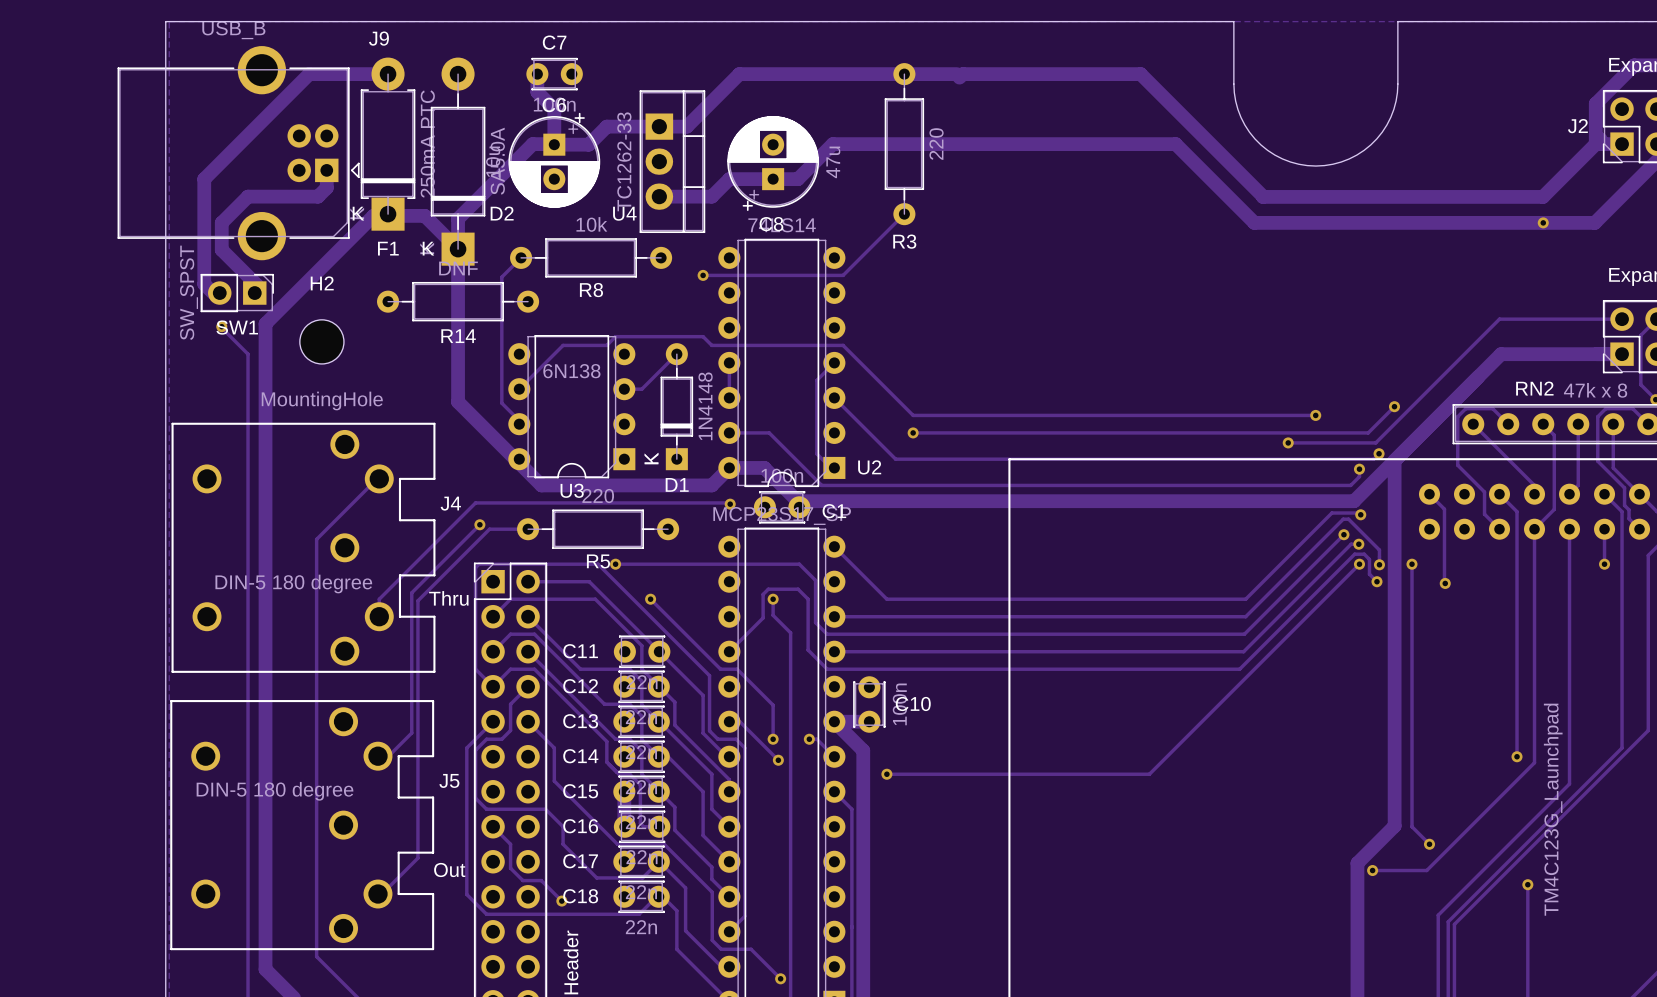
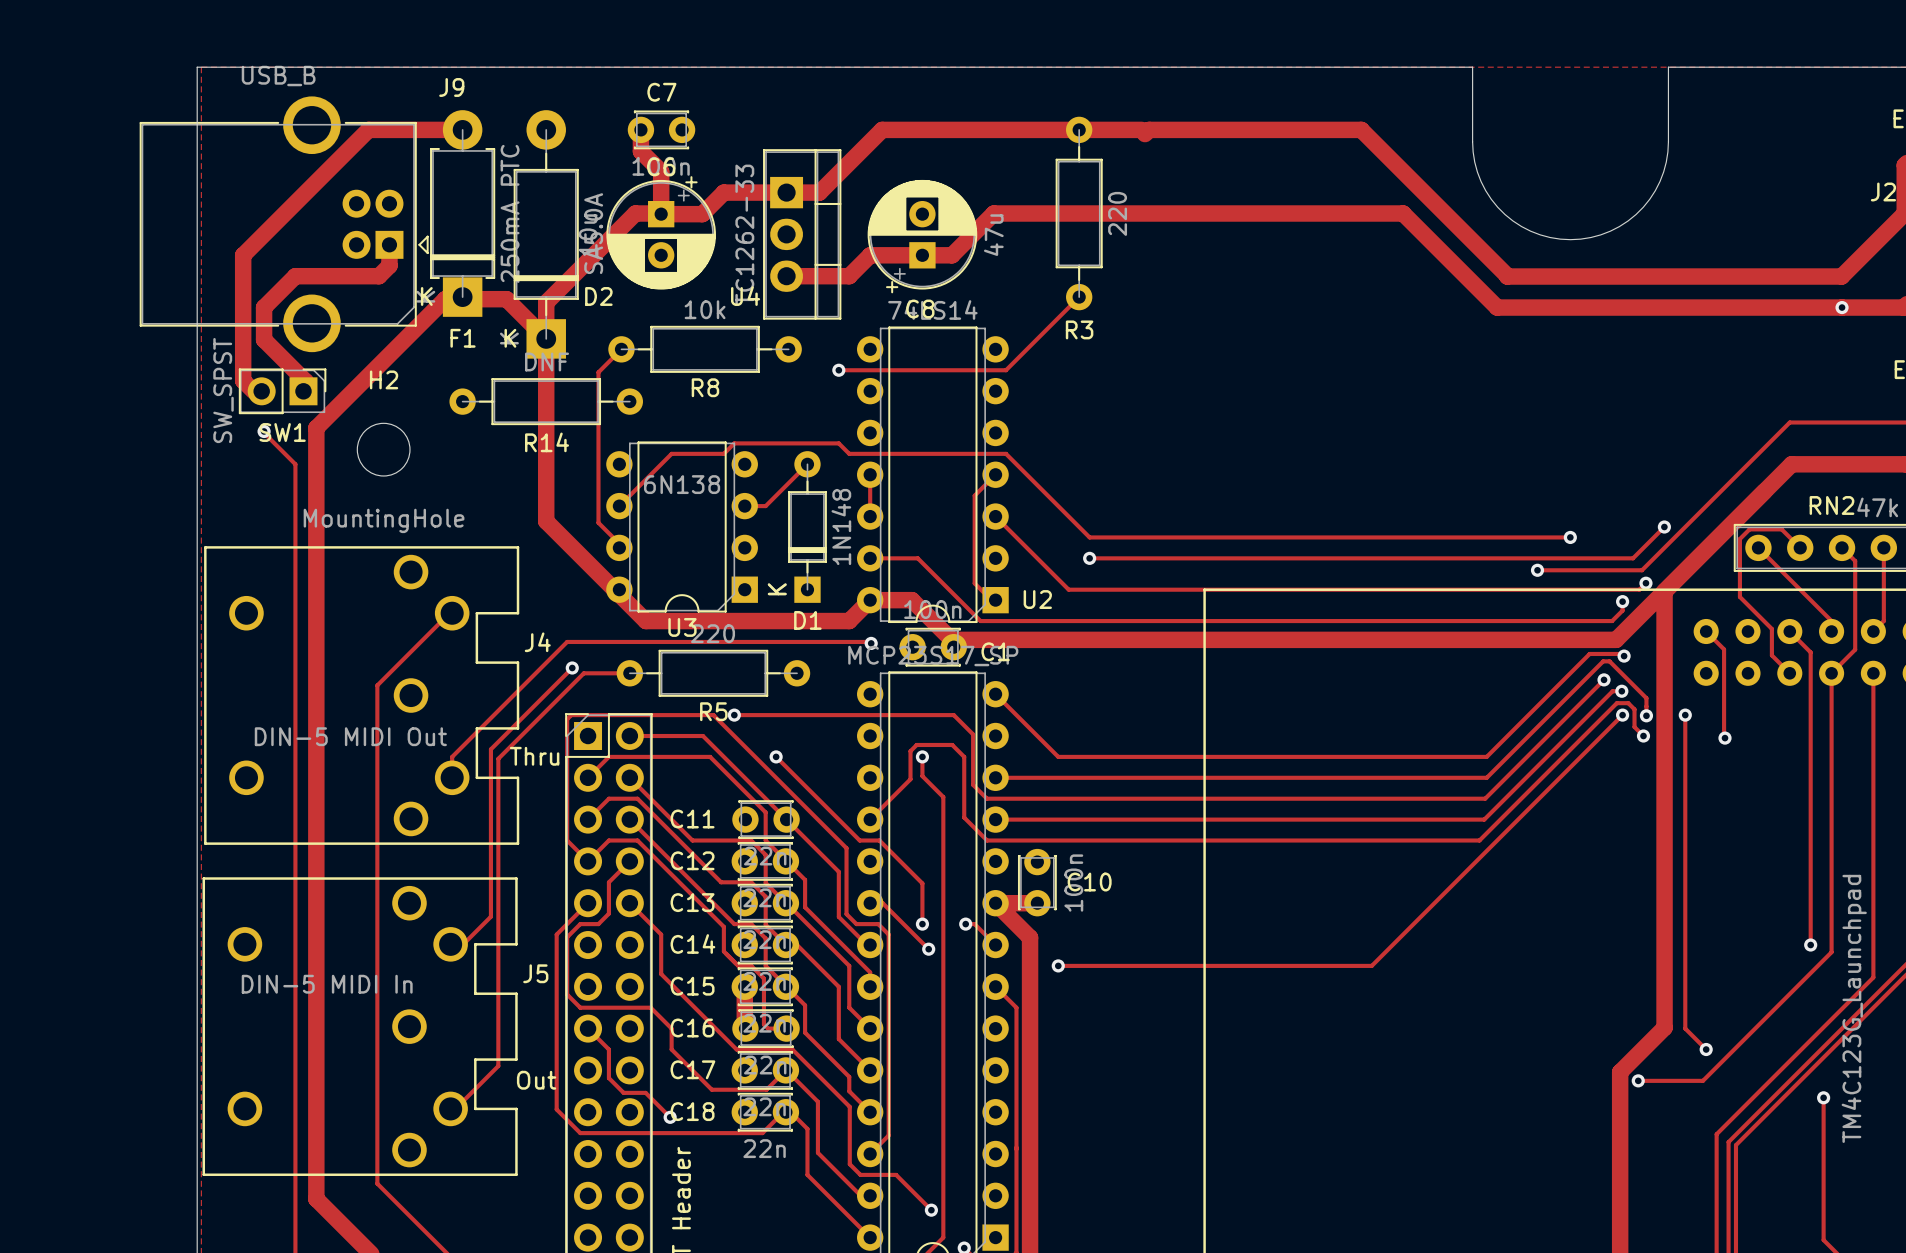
D1 value: 1N4148 (705, 406) -> 1N148 (841, 527)
J4 value: DIN-5 180 degree (293, 584) -> DIN-5 MIDI Out (350, 736)
J5 value: DIN-5 180 degree (275, 791) -> DIN-5 MIDI In (327, 984)

